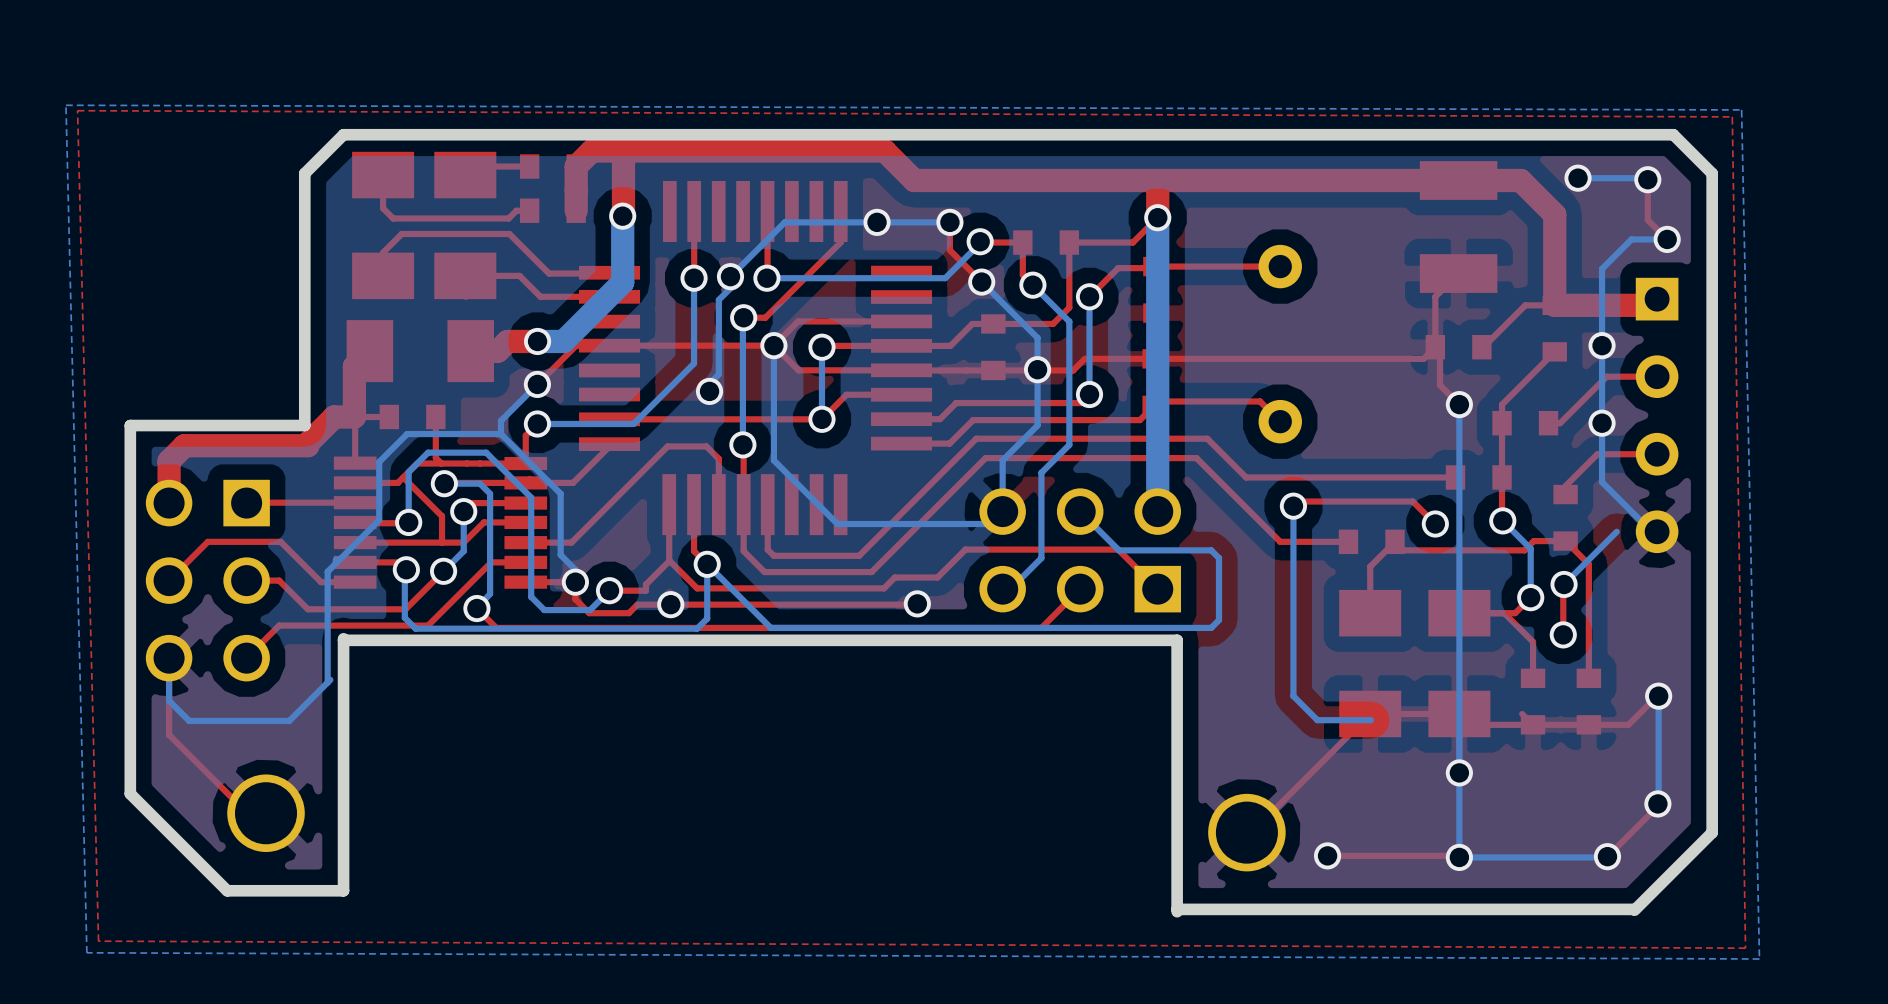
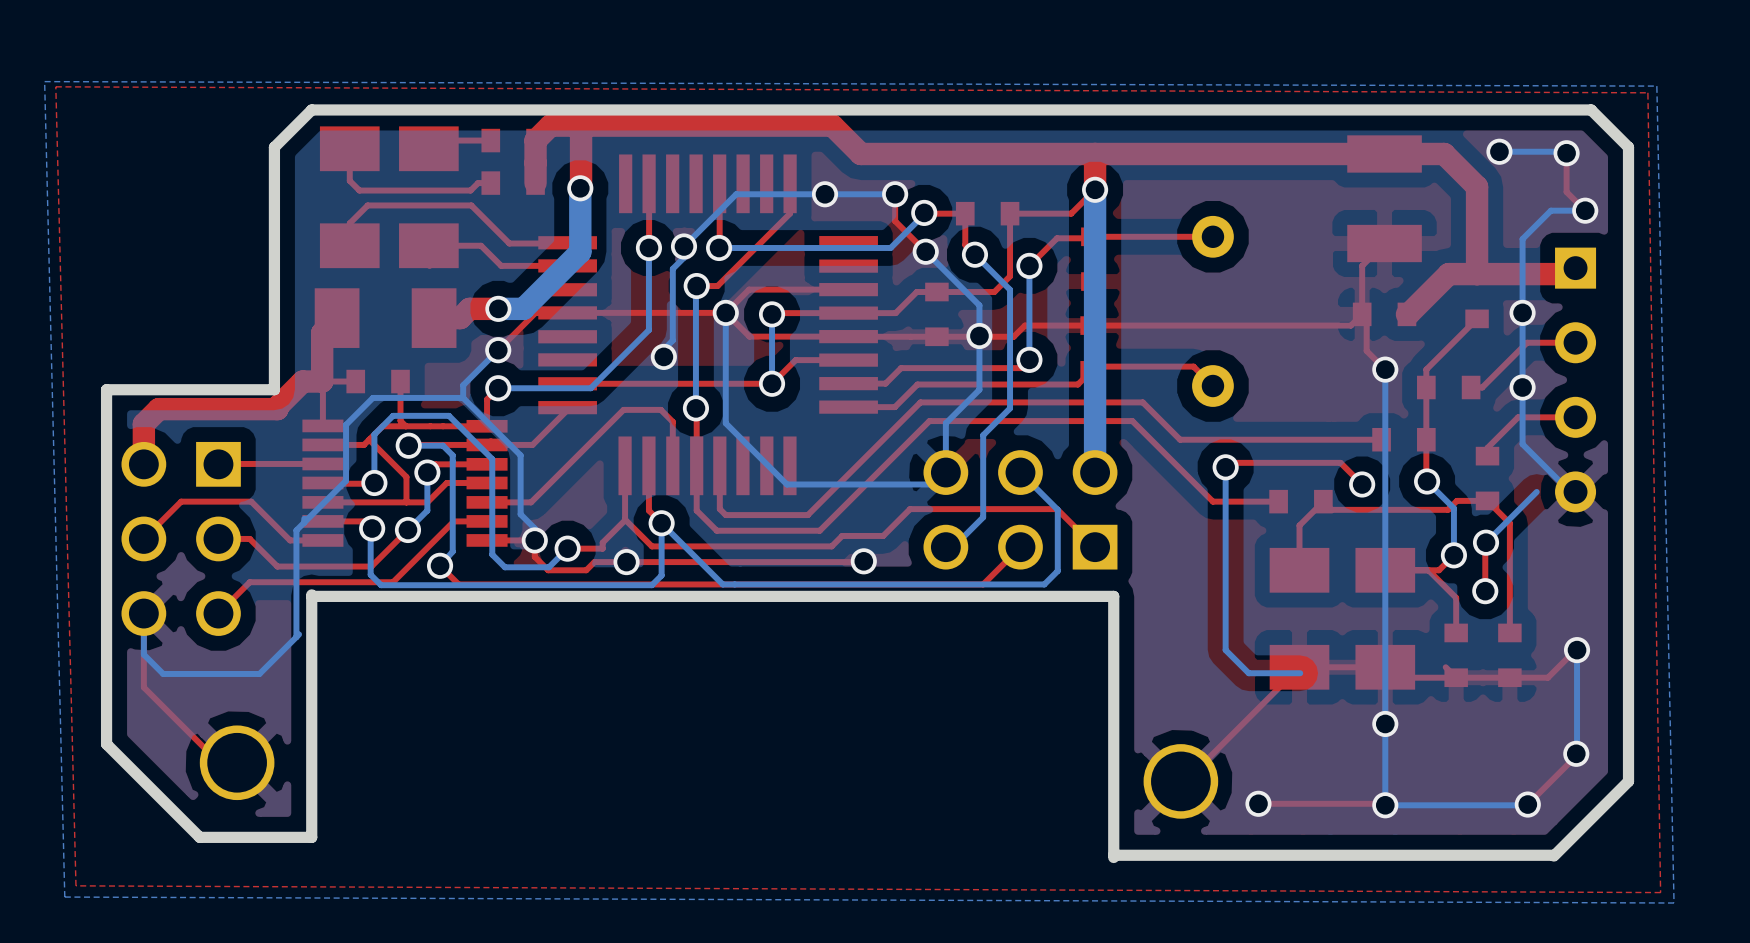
top track width: thin (1554, 305) (1525, 305) (1481, 347) -> thick (1477, 274) (1448, 274) (1406, 314)
bottom track: (1118, 550) (1211, 550) (1219, 558) (1219, 620) (1211, 627) (1105, 627) -> (1057, 509) (1057, 571) (1044, 584)

